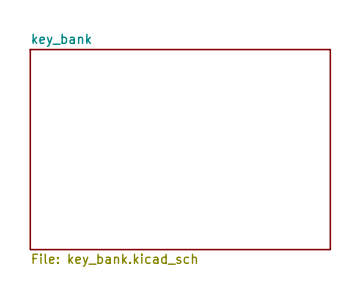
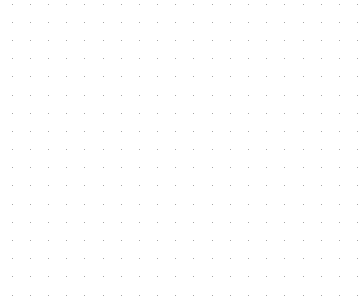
sheet key_bank: File: key_bank.kicad_sch (180, 149) -> none

